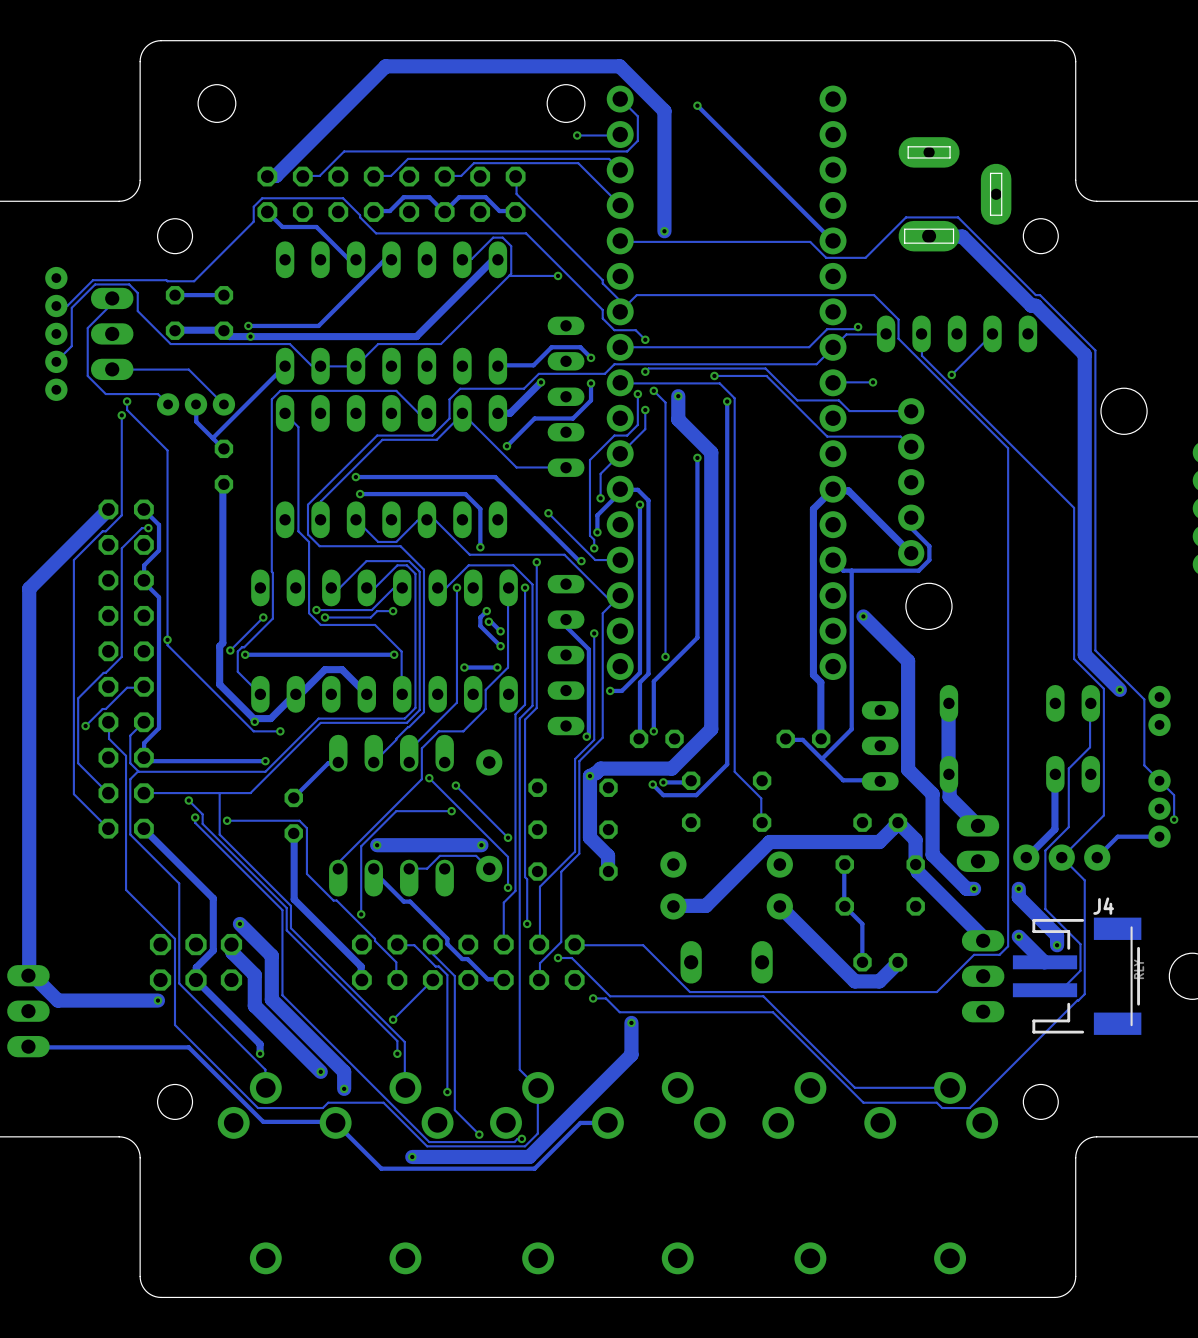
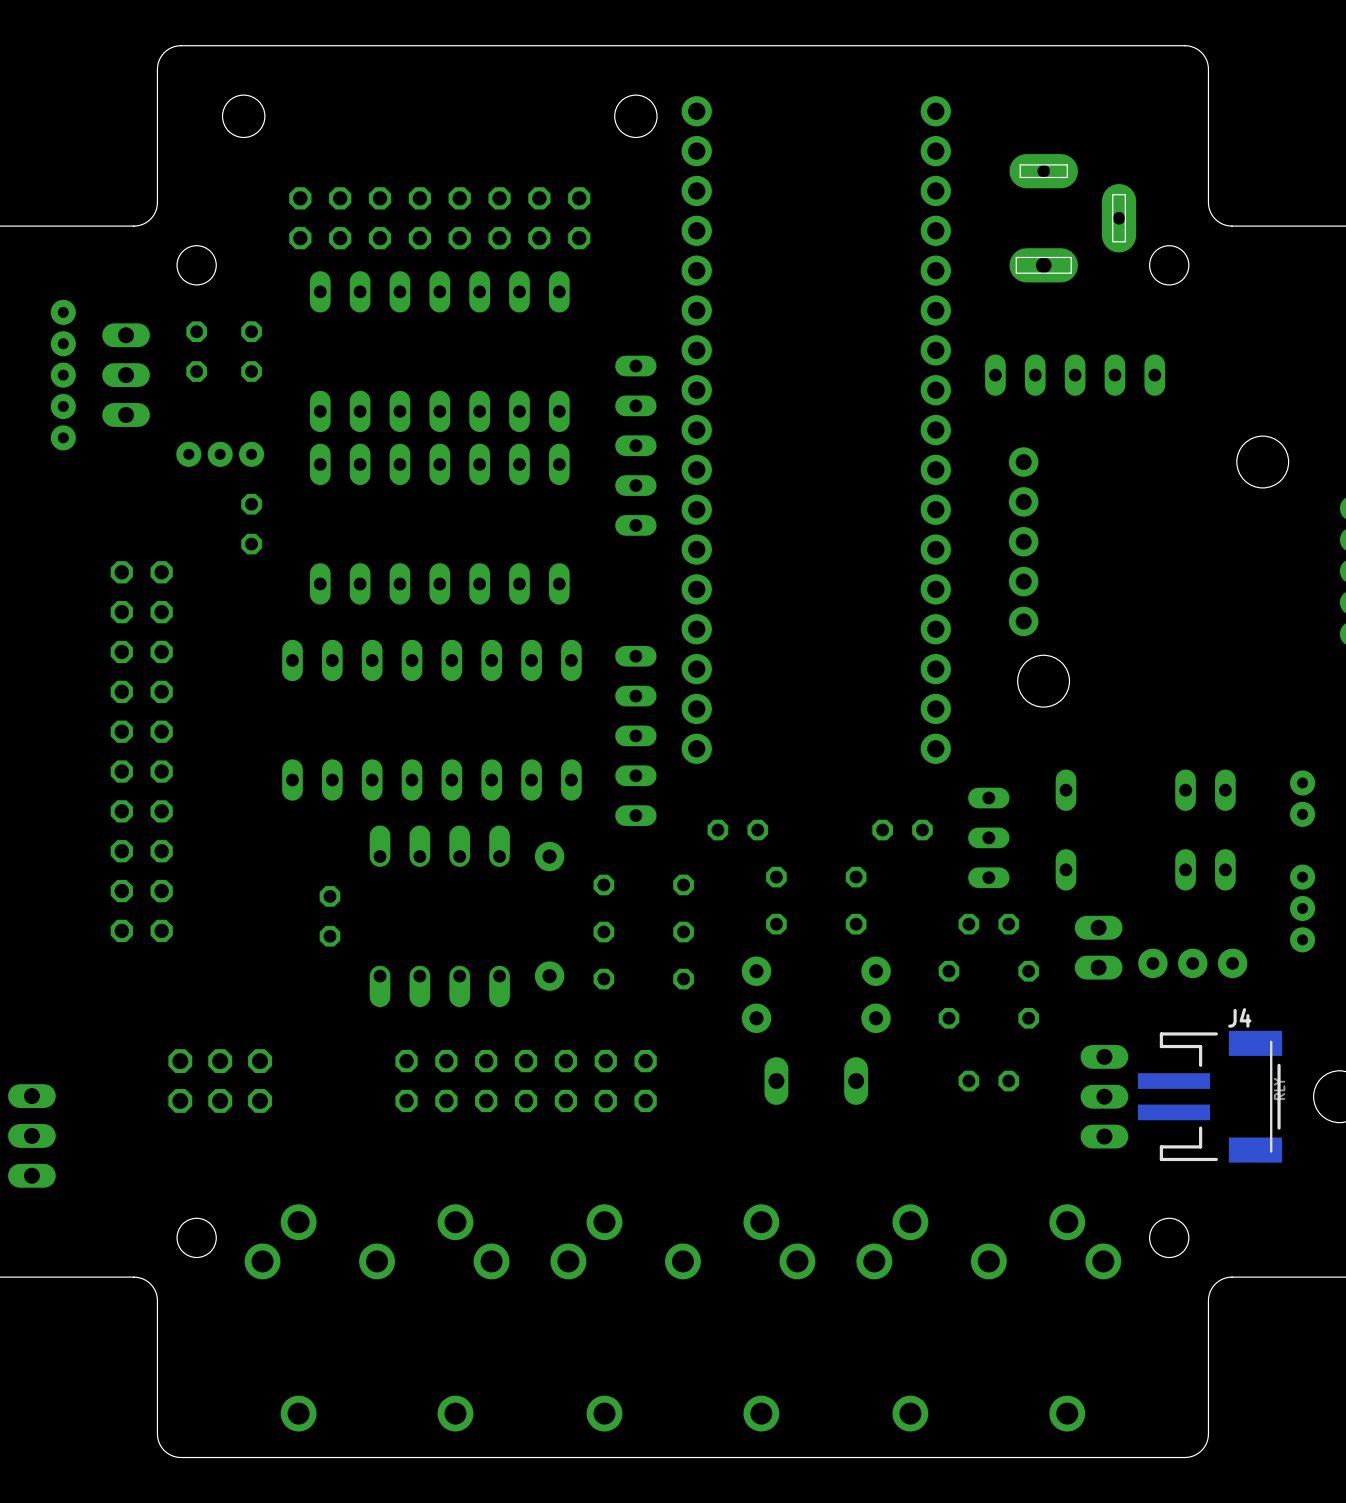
track: (620, 99) (637, 116) (637, 140) (627, 151) (344, 151) (319, 175) (302, 176) -> none
track: (697, 105) (833, 240) -> none
via: (697, 105) -> none
track: (620, 134) (577, 135) -> none
via: (577, 135) -> none
track: (620, 169) (609, 158) (408, 158) (390, 175) (373, 176) -> none
track: (267, 176) (276, 175) (385, 66) (619, 66) (664, 111) (664, 231) -> none
track: (444, 176) (461, 175) (473, 163) (578, 163) (620, 205) -> none
track: (515, 176) (516, 194) (602, 280) (602, 283) (625, 305) (620, 311) (636, 295) (874, 295) (898, 319) (898, 338) (1008, 448) (1008, 946) (999, 954) (974, 954) (936, 992) (689, 992) (643, 945) (574, 944) -> none
track: (267, 212) (282, 227) (316, 227) (348, 258) (356, 259) -> none
track: (515, 212) (499, 211) (485, 197) (459, 197) (444, 212) (429, 197) (403, 197) (389, 211) (373, 212) -> none
via: (664, 231) -> none
track: (929, 236) (962, 236) (1031, 305) (1035, 305) (1084, 354) (1084, 654) (1119, 689) -> none
track: (620, 240) (810, 241) (826, 257) (865, 257) (905, 217) (958, 217) (1035, 295) (1040, 295) (1095, 350) (1095, 650) (1144, 699) (1144, 765) (1174, 795) (1174, 819) -> none
track: (391, 259) (384, 259) (318, 325) (248, 325) -> none
track: (462, 259) (471, 258) (493, 237) (502, 237) (511, 246) (511, 273) (441, 344) (378, 344) (356, 366) -> none
track: (497, 259) (493, 259) (416, 336) (229, 336) (222, 330) (175, 330) -> none
track: (509, 275) (558, 275) -> none
via: (558, 275) -> none
track: (223, 295) (175, 295) -> none
track: (112, 298) (112, 303) (87, 328) (87, 375) (105, 394) (157, 394) (168, 404) -> none
track: (56, 306) (67, 305) (93, 280) (194, 281) (253, 221) (253, 206) (262, 198) (343, 198) (376, 233) (526, 233) (602, 309) (602, 318) (614, 330) (635, 330) (645, 339) -> none
via: (248, 325) -> none
track: (858, 327) (855, 329) (827, 329) (809, 347) (620, 347) -> none
via: (858, 327) -> none
track: (886, 333) (846, 334) (816, 364) (614, 364) (604, 373) (538, 373) (523, 388) (460, 388) (449, 399) (449, 418) (432, 435) (377, 435) (307, 504) (307, 534) (319, 546) (400, 546) (423, 569) (423, 712) (373, 762) -> none
track: (921, 333) (921, 355) (1074, 507) (1074, 659) (1103, 688) (1103, 815) (1061, 857) (1084, 880) (1084, 994) (969, 1108) (942, 1108) (936, 1102) (863, 1102) (772, 1012) (619, 1012) (605, 998) (593, 998) -> none
track: (992, 333) (951, 374) -> none
via: (250, 336) -> none
via: (645, 339) -> none
track: (591, 357) (580, 347) (551, 347) (533, 365) (497, 366) -> none
via: (591, 357) -> none
track: (56, 361) (71, 346) (71, 307) (95, 284) (129, 284) (137, 292) (137, 311) (170, 344) (289, 344) (311, 365) (355, 366) -> none
track: (285, 366) (212, 438) -> none
track: (112, 369) (188, 369) (223, 404) -> none
track: (645, 371) (648, 368) (765, 368) (797, 400) (838, 400) (849, 411) (911, 411) -> none
via: (645, 371) -> none
via: (951, 374) -> none
track: (714, 375) (766, 375) (827, 436) (900, 436) (911, 446) -> none
via: (714, 375) -> none
track: (541, 382) (510, 413) (497, 413) -> none
via: (541, 382) -> none
track: (620, 382) (719, 383) (734, 398) (734, 771) (761, 798) (762, 822) -> none
track: (873, 382) (833, 382) -> none
via: (873, 382) -> none
track: (591, 383) (591, 400) (572, 418) (534, 418) (506, 446) -> none
via: (591, 383) -> none
track: (653, 390) (665, 402) (665, 656) -> none
via: (653, 390) -> none
track: (637, 394) (637, 424) (627, 435) (614, 435) (589, 460) (589, 535) (594, 539) (594, 548) -> none
via: (637, 394) -> none
track: (678, 396) (678, 419) (711, 452) (711, 729) (671, 768) (600, 768) (589, 776) (589, 837) (608, 855) (608, 871) -> none
via: (678, 396) -> none
track: (127, 401) (127, 410) (167, 450) (167, 645) (253, 731) (280, 731) -> none
via: (127, 401) -> none
track: (727, 401) (727, 764) (696, 795) (663, 795) (652, 784) -> none
via: (727, 401) -> none
track: (196, 404) (196, 421) (223, 448) -> none
track: (645, 410) (645, 429) (600, 473) (600, 498) -> none
via: (645, 410) -> none
track: (285, 413) (298, 427) (298, 531) (309, 541) (309, 613) (320, 624) (375, 624) (401, 651) (402, 694) -> none
track: (426, 413) (418, 413) (396, 390) (280, 390) (271, 399) (272, 618) (237, 651) (237, 671) (260, 694) -> none
track: (121, 415) (121, 515) (73, 560) (73, 794) (108, 828) -> none
via: (121, 415) -> none
via: (506, 446) -> none
track: (697, 457) (697, 637) (653, 681) (653, 731) -> none
via: (697, 457) -> none
track: (566, 467) (516, 467) (462, 413) (436, 439) (382, 439) (320, 501) (320, 519) -> none
track: (355, 477) (495, 477) (581, 561) -> none
via: (355, 477) -> none
track: (223, 484) (222, 643) (219, 646) (219, 684) (253, 718) -> none
track: (360, 494) (465, 494) (480, 508) (480, 547) -> none
via: (360, 494) -> none
via: (600, 498) -> none
track: (639, 504) (639, 672) (621, 690) (610, 690) -> none
via: (639, 504) -> none
track: (108, 509) (29, 588) (28, 975) (35, 978) (57, 1000) (157, 1000) -> none
track: (143, 509) (159, 524) (159, 550) (144, 565) (144, 580) -> none
track: (548, 513) (595, 560) (620, 560) -> none
via: (548, 513) -> none
track: (911, 517) (911, 528) (929, 546) (929, 560) (918, 570) (843, 570) (833, 560) -> none
track: (356, 519) (378, 541) (396, 541) (417, 520) (426, 519) (435, 520) (469, 554) (564, 554) (612, 602) (620, 595) (602, 613) (602, 737) (579, 761) (579, 853) (561, 871) (561, 942) (539, 963) (539, 980) -> none
track: (148, 528) (142, 528) (121, 548) (121, 656) (78, 698) (78, 763) (108, 793) -> none
via: (148, 528) -> none
track: (597, 532) (597, 515) (620, 491) (620, 489) (637, 489) (648, 500) (648, 673) (639, 682) (639, 738) -> none
via: (597, 532) -> none
via: (480, 547) -> none
via: (594, 548) -> none
track: (911, 553) (848, 490) (833, 489) (813, 508) (813, 674) (820, 682) (821, 738) -> none
via: (581, 561) -> none
track: (536, 562) (536, 707) (525, 719) (525, 877) (527, 879) (527, 923) -> none
via: (536, 562) -> none
track: (851, 570) (851, 729) (821, 759) -> none
track: (143, 580) (159, 597) (159, 728) (144, 743) (143, 757) (147, 761) (265, 761) -> none
track: (331, 587) (339, 587) (366, 561) (409, 561) (419, 571) (419, 710) (406, 722) (320, 722) (250, 793) (144, 793) -> none
track: (366, 587) (375, 587) (397, 565) (406, 565) (415, 573) (415, 707) (404, 718) (318, 718) (265, 771) (138, 771) (130, 763) (130, 735) (143, 722) -> none
track: (402, 587) (393, 588) (371, 610) (316, 610) -> none
track: (437, 587) (446, 587) (468, 565) (513, 565) (532, 584) (532, 705) (519, 718) (519, 1069) (538, 1087) (537, 1133) (525, 1146) (427, 1146) (383, 1102) (328, 1102) (322, 1108) (257, 1108) (174, 1025) (174, 938) (126, 889) (126, 755) (109, 738) (108, 722) -> none
track: (456, 587) (456, 702) (410, 749) (409, 762) -> none
via: (456, 587) -> none
track: (508, 587) (508, 667) (485, 689) (485, 709) (463, 731) (438, 731) (421, 748) (421, 779) (338, 862) (338, 868) -> none
track: (525, 587) (525, 704) (515, 714) (515, 890) (503, 902) (503, 944) -> none
via: (525, 587) -> none
via: (316, 610) -> none
track: (393, 611) (377, 611) (370, 617) (325, 617) -> none
via: (393, 611) -> none
track: (486, 611) (480, 617) (480, 626) (500, 646) -> none
via: (486, 611) -> none
track: (863, 616) (908, 661) (908, 769) (932, 794) (932, 854) (966, 888) (974, 888) -> none
via: (863, 616) -> none
track: (263, 617) (230, 650) -> none
via: (263, 617) -> none
via: (325, 617) -> none
track: (566, 619) (566, 627) (588, 649) (588, 734) (586, 736) -> none
track: (488, 621) (500, 631) -> none
via: (488, 621) -> none
via: (500, 631) -> none
track: (594, 633) (594, 739) (575, 759) (575, 851) (539, 886) (539, 944) -> none
via: (594, 633) -> none
via: (167, 639) -> none
via: (500, 646) -> none
via: (230, 650) -> none
via: (245, 654) -> none
track: (394, 654) (245, 654) -> none
via: (394, 654) -> none
via: (665, 656) -> none
via: (464, 667) -> none
track: (497, 667) (464, 667) -> none
via: (497, 667) -> none
track: (143, 686) (127, 687) (85, 726) -> none
via: (1119, 689) -> none
via: (610, 690) -> none
track: (366, 694) (342, 669) (325, 669) (300, 694) (293, 696) (270, 718) (253, 718) -> none
track: (948, 703) (949, 797) (977, 825) -> none
track: (1090, 703) (1090, 747) (1068, 768) (1068, 827) (1045, 850) (1045, 909) (1080, 944) (1080, 970) (1061, 989) (1045, 990) -> none
via: (254, 721) -> none
via: (85, 726) -> none
via: (280, 731) -> none
via: (653, 731) -> none
via: (586, 736) -> none
track: (785, 738) (802, 739) (843, 780) (880, 781) -> none
via: (265, 761) -> none
track: (338, 762) (328, 763) (293, 797) -> none
track: (138, 771) (130, 779) (130, 834) (179, 883) (179, 983) (265, 1069) (265, 1087) -> none
track: (1055, 774) (1054, 829) (1026, 857) -> none
via: (589, 776) -> none
track: (429, 778) (508, 856) (508, 887) -> none
via: (429, 778) -> none
track: (691, 780) (689, 782) (663, 782) -> none
via: (663, 782) -> none
via: (652, 784) -> none
track: (455, 785) (508, 837) -> none
via: (455, 785) -> none
track: (219, 793) (219, 834) (290, 905) (290, 928) (404, 1042) (405, 1087) -> none
track: (188, 800) (202, 814) (202, 823) (286, 907) (286, 930) (397, 1041) (397, 1053) -> none
via: (188, 800) -> none
track: (451, 811) (396, 811) (361, 846) (361, 914) -> none
via: (451, 811) -> none
track: (195, 817) (195, 822) (282, 910) (282, 995) (429, 1142) (514, 1142) (517, 1138) (521, 1138) -> none
via: (195, 817) -> none
via: (1174, 819) -> none
track: (227, 820) (299, 820) (306, 828) (306, 873) (333, 900) (336, 900) (396, 962) (397, 980) -> none
via: (227, 820) -> none
track: (143, 828) (213, 898) (213, 950) (196, 967) (196, 980) (260, 1044) (260, 1053) -> none
track: (293, 833) (294, 899) (361, 966) (361, 980) -> none
track: (1159, 836) (1117, 836) (1097, 857) -> none
via: (508, 837) -> none
via: (377, 845) -> none
track: (481, 845) (377, 845) -> none
via: (481, 845) -> none
track: (844, 864) (844, 904) (862, 923) (862, 962) -> none
track: (915, 864) (915, 839) (897, 822) (879, 842) (769, 842) (705, 905) (673, 906) -> none
track: (915, 864) (917, 871) (982, 936) (983, 940) -> none
track: (373, 868) (373, 871) (403, 901) (410, 901) (447, 938) (447, 944) (462, 959) (467, 959) (487, 979) (503, 980) -> none
track: (489, 868) (476, 855) (439, 855) (427, 868) (409, 868) -> none
via: (508, 887) -> none
via: (974, 888) -> none
track: (1018, 888) (1018, 897) (1057, 935) (1057, 945) -> none
via: (1018, 888) -> none
track: (779, 906) (854, 981) (879, 981) (897, 962) -> none
via: (361, 914) -> none
track: (239, 923) (271, 955) (271, 999) (344, 1071) (344, 1088) -> none
via: (239, 923) -> none
via: (527, 923) -> none
track: (1018, 936) (1045, 962) -> none
via: (1018, 936) -> none
track: (231, 944) (232, 952) (254, 975) (254, 1005) (320, 1071) -> none
track: (397, 944) (414, 945) (435, 966) (438, 966) (447, 975) (447, 1092) -> none
track: (432, 944) (433, 954) (454, 976) (454, 1110) (479, 1134) -> none
via: (1057, 945) -> none
track: (558, 958) (571, 958) (610, 996) (763, 996) (854, 1087) (950, 1087) -> none
via: (558, 958) -> none
track: (432, 980) (393, 1019) -> none
via: (593, 998) -> none
via: (157, 1000) -> none
via: (393, 1019) -> none
track: (631, 1022) (631, 1054) (529, 1156) (412, 1156) -> none
via: (631, 1022) -> none
track: (28, 1046) (188, 1047) (263, 1121) (334, 1121) (381, 1168) (534, 1168) (580, 1122) (607, 1122) -> none
via: (260, 1053) -> none
via: (397, 1053) -> none
via: (320, 1071) -> none
via: (344, 1088) -> none
via: (447, 1092) -> none
via: (479, 1134) -> none
via: (521, 1138) -> none
via: (412, 1156) -> none

